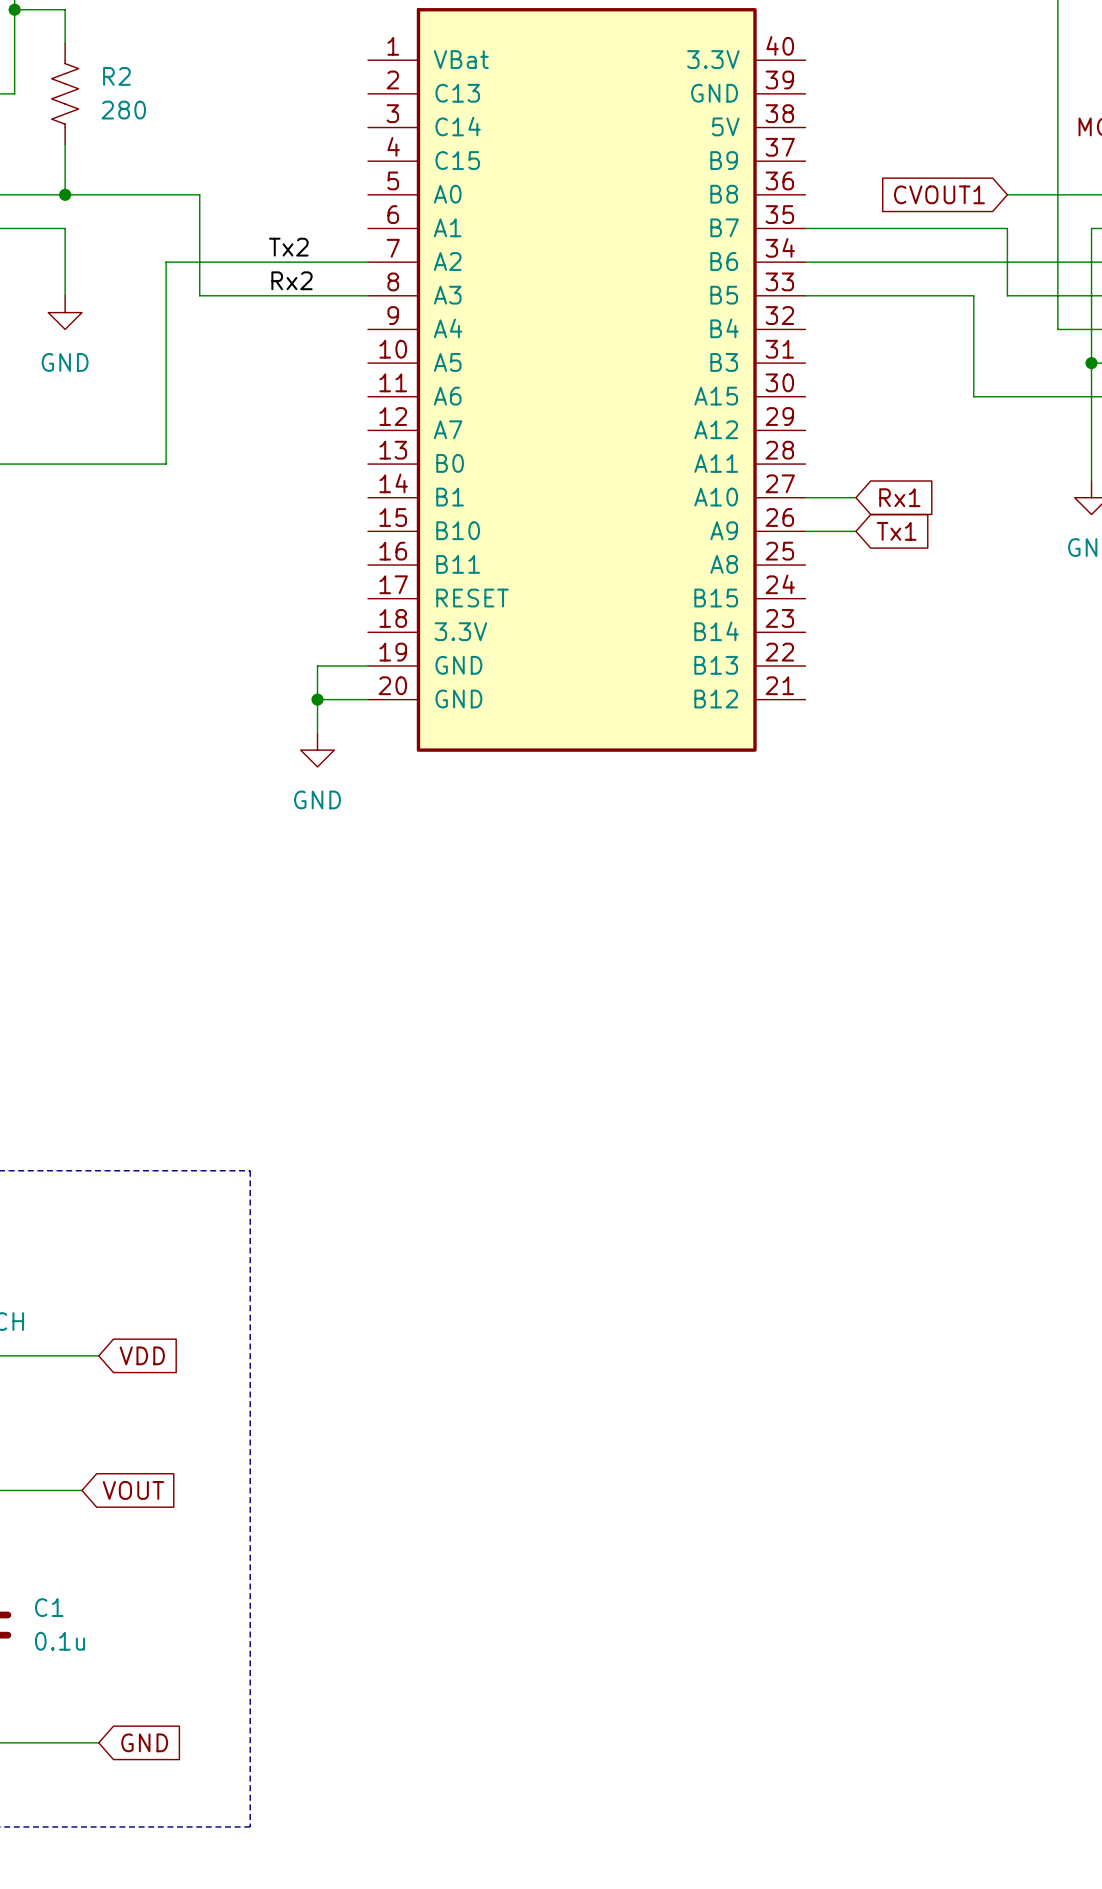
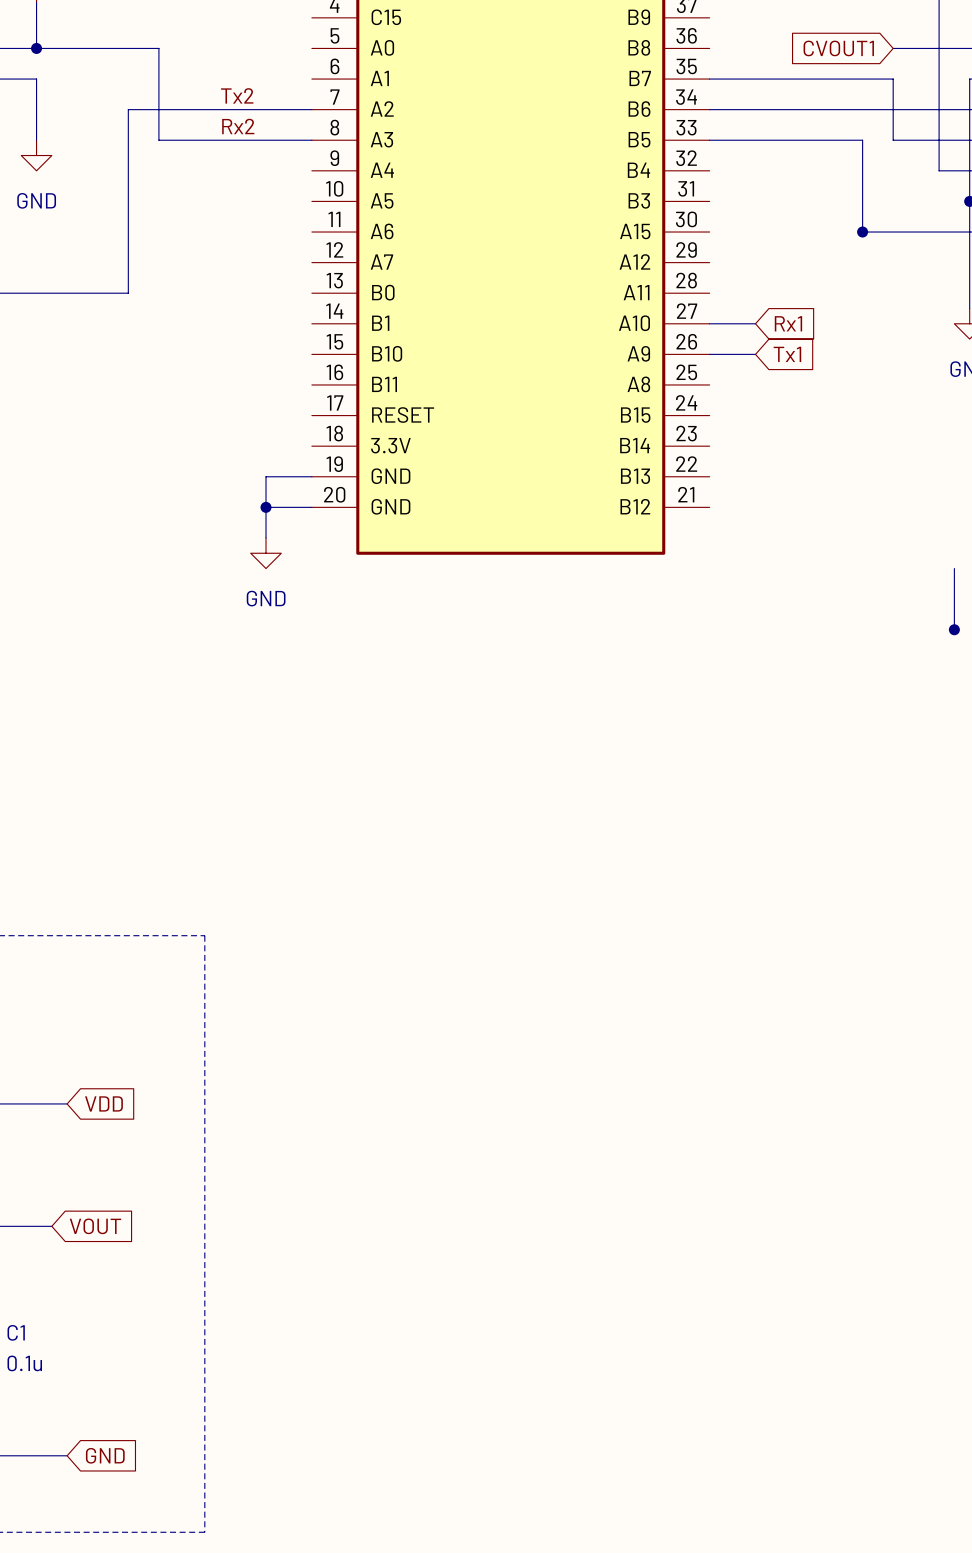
junction: none -> (862, 232)
wire: none -> (954, 568) (954, 629)
junction: none -> (954, 629)

